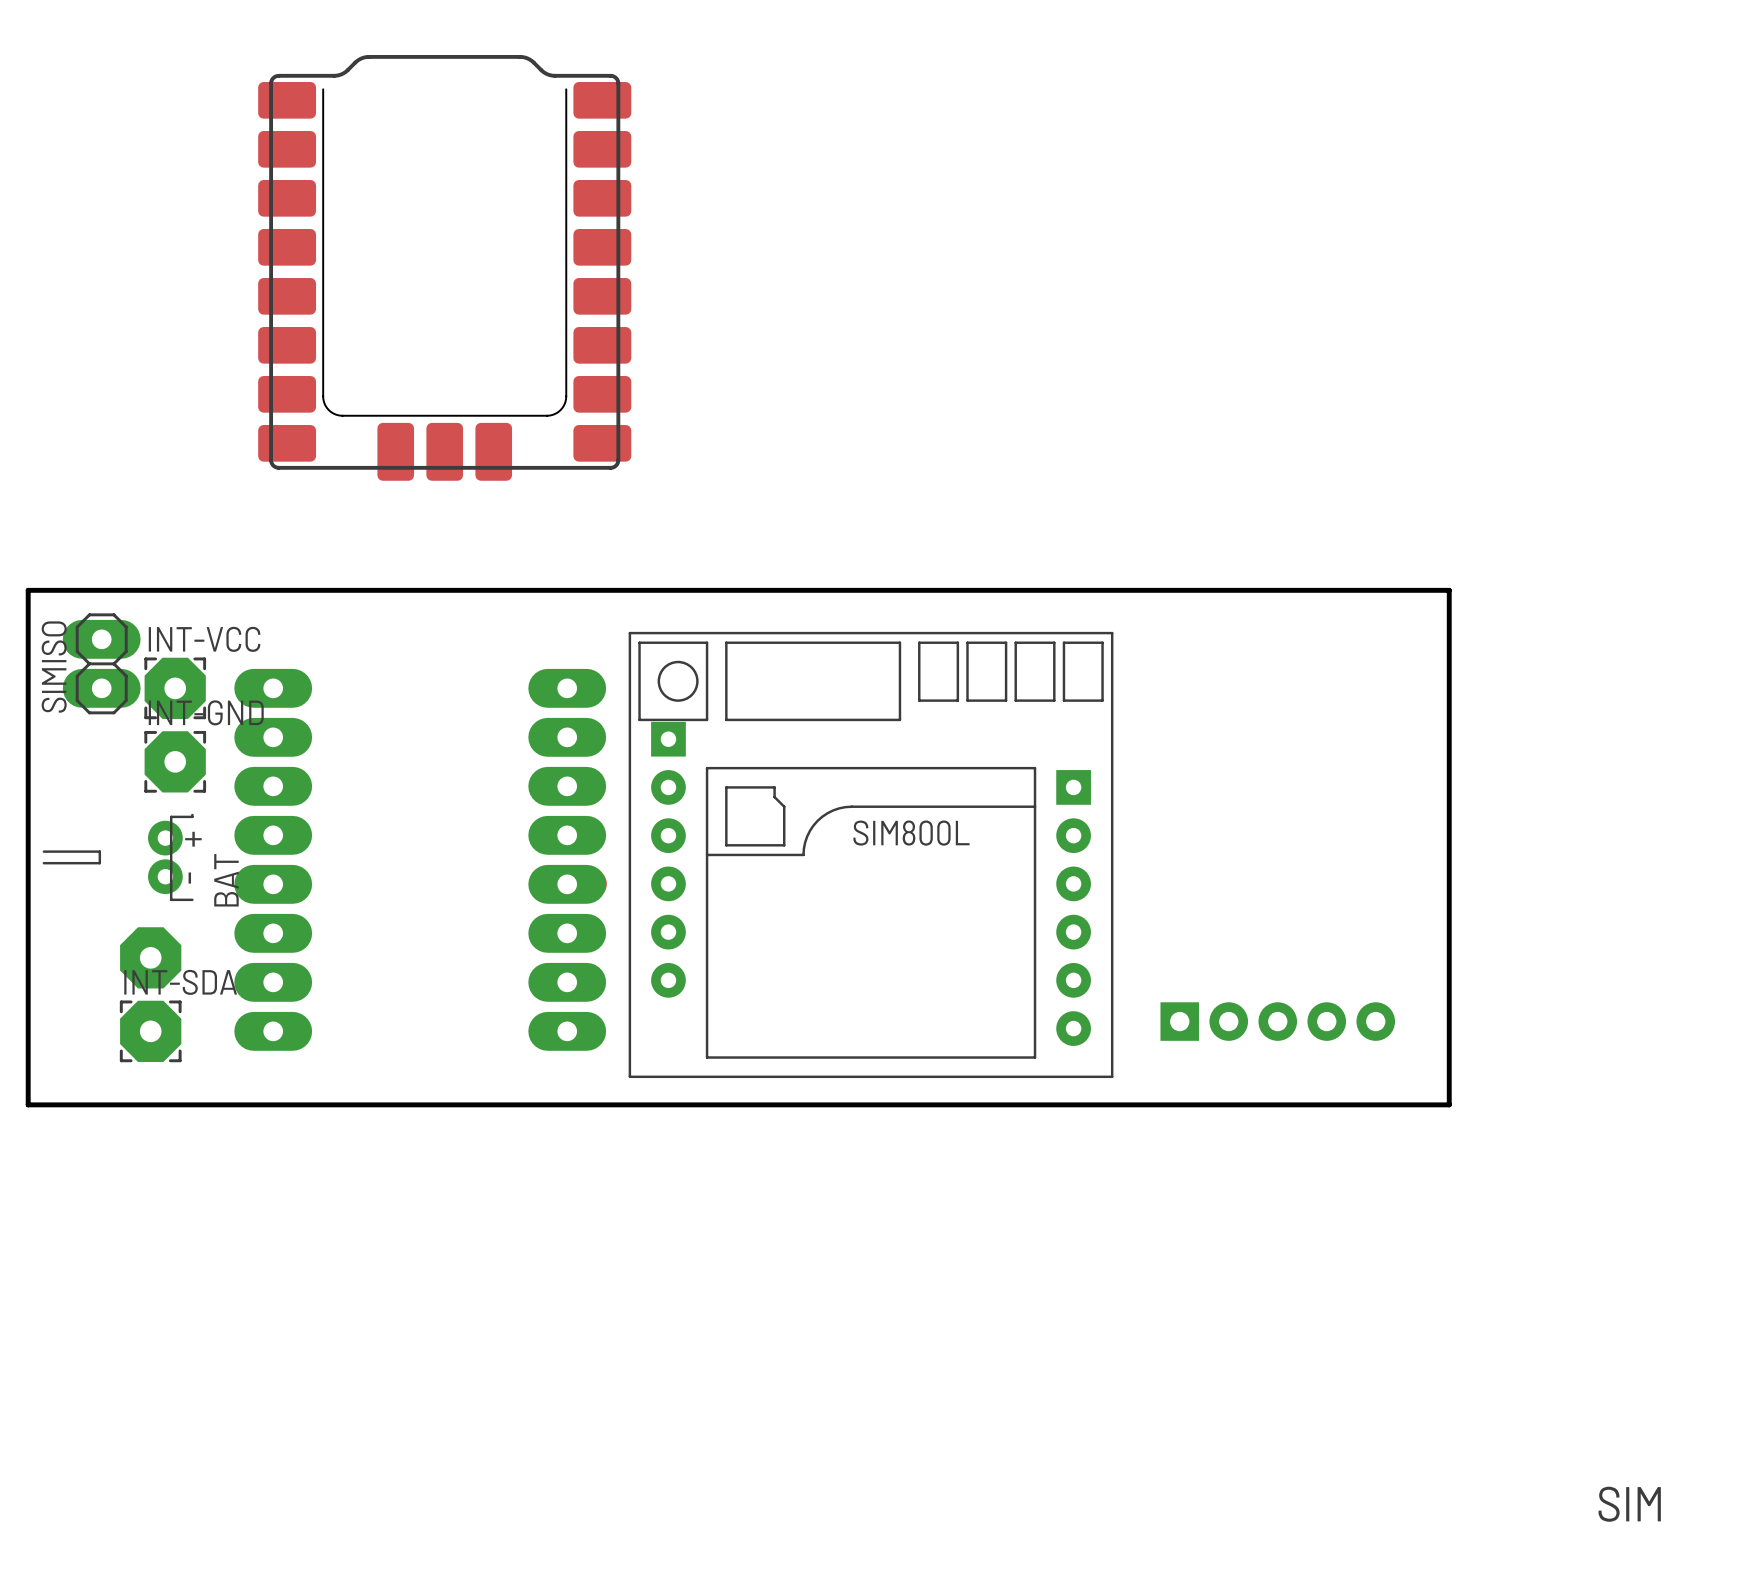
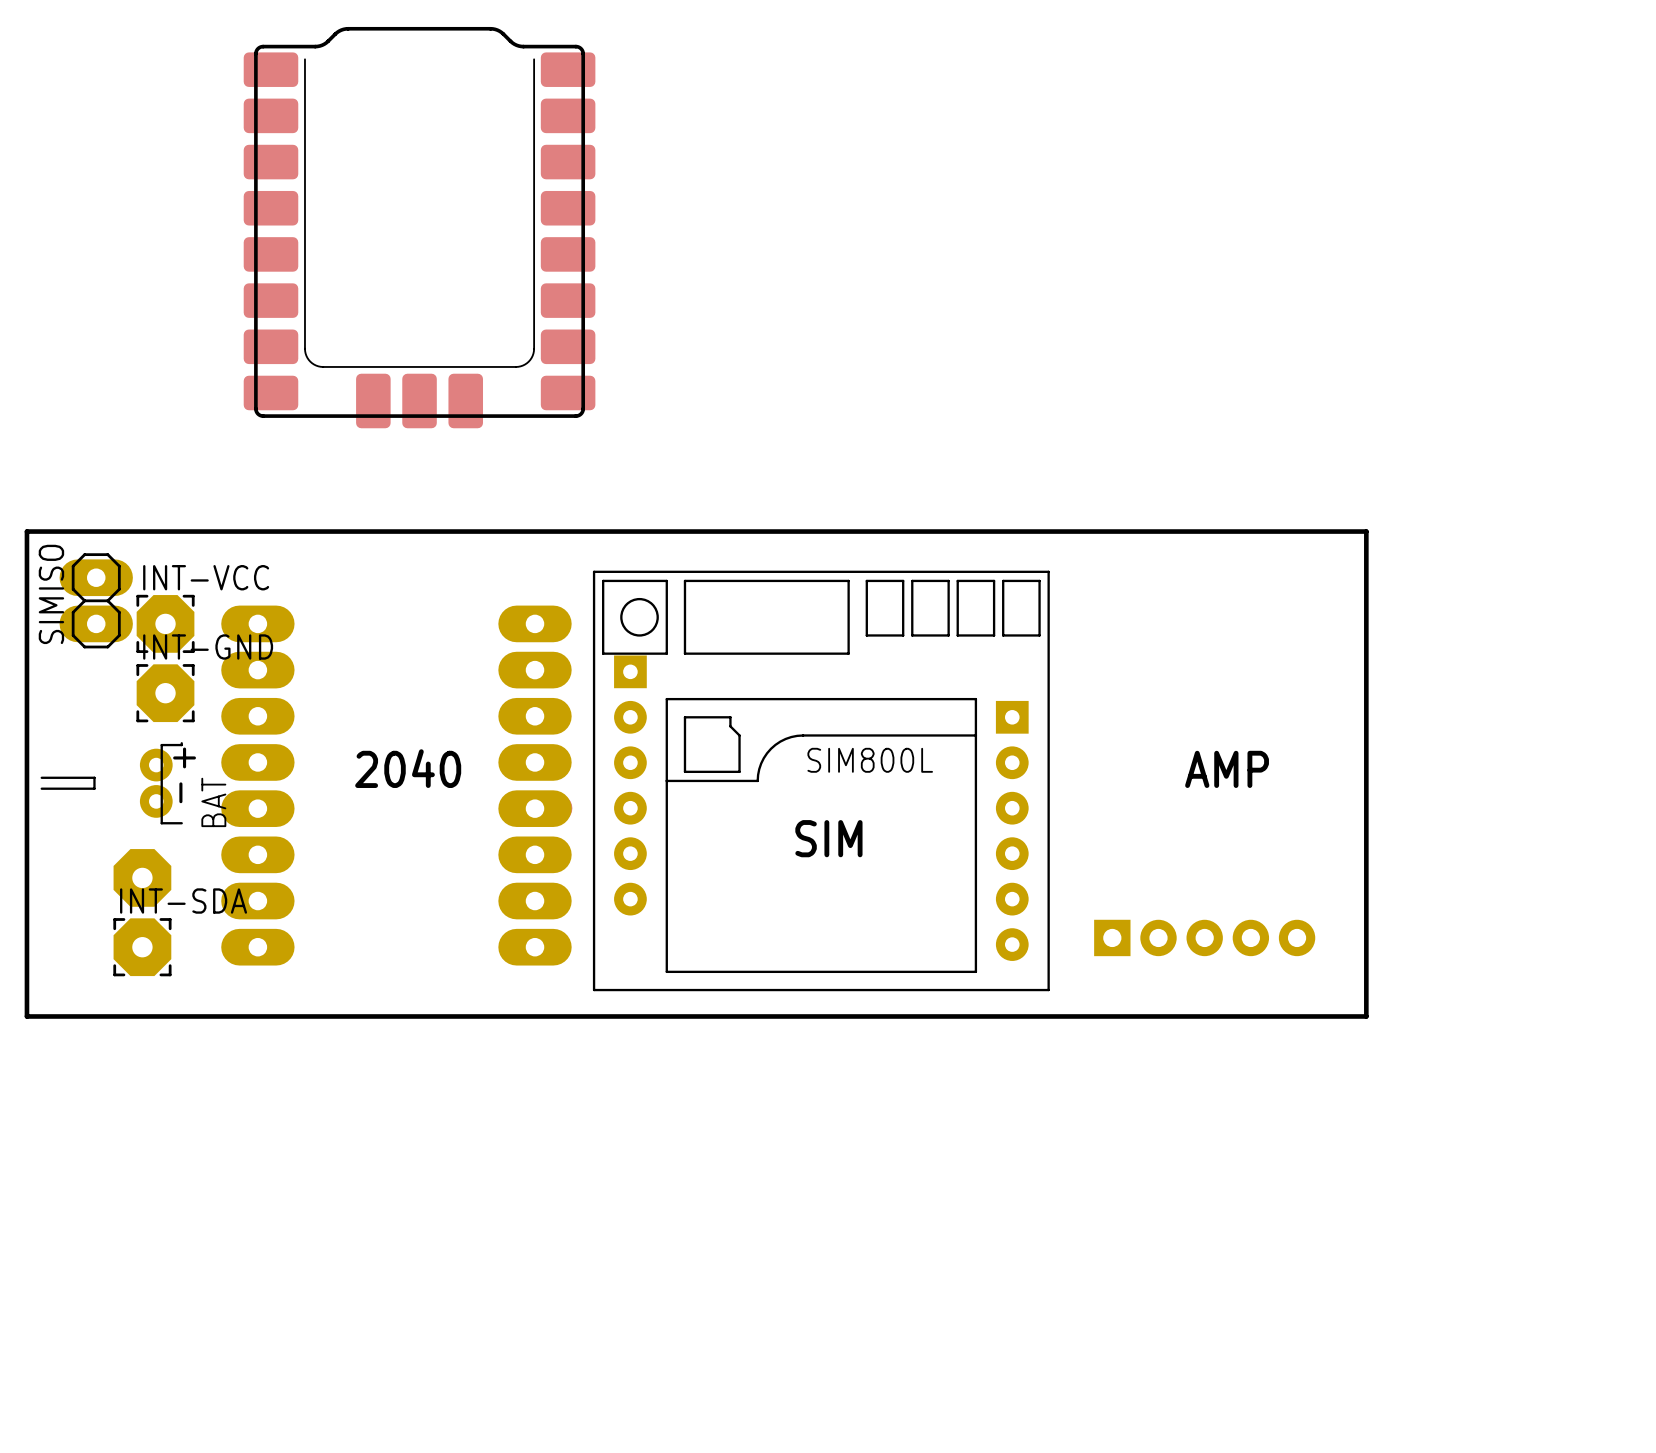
text: none -> 2040 (408, 768)
text: none -> AMP (1227, 769)
text: none -> SIM (828, 838)
text: SIM (1629, 1504) -> none

